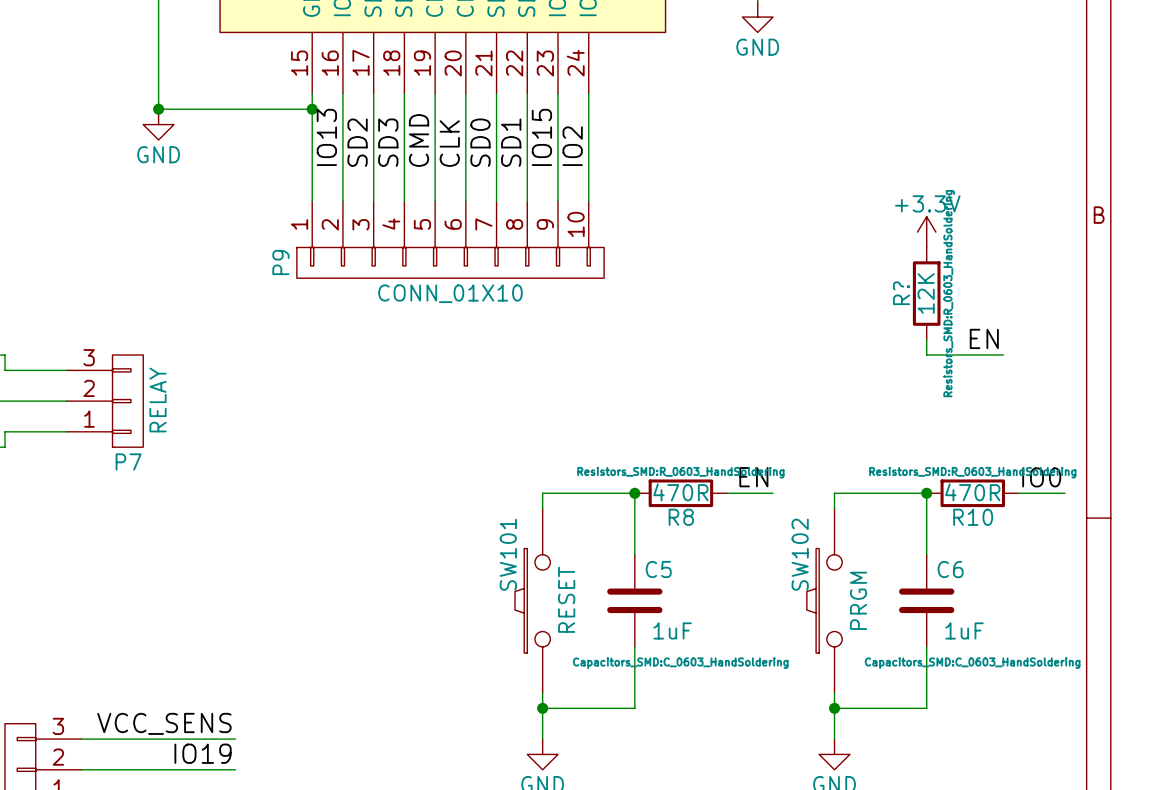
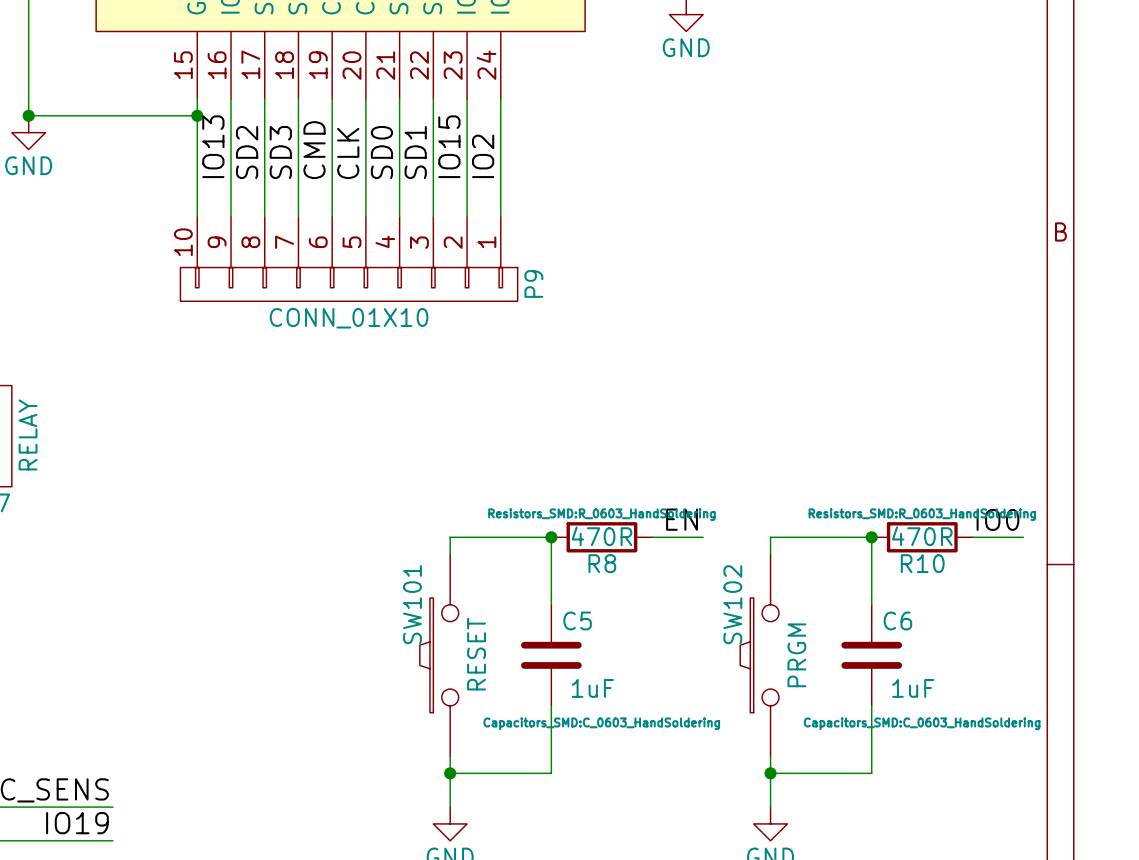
power symbol: +3.3V (926, 232) -> none
P9 flip: as is (450, 262) -> left-right (349, 284)
R?: 12K (926, 293) -> none
label: EN (984, 338) -> none
wire: (926, 339) (926, 355) (1003, 355) -> none

